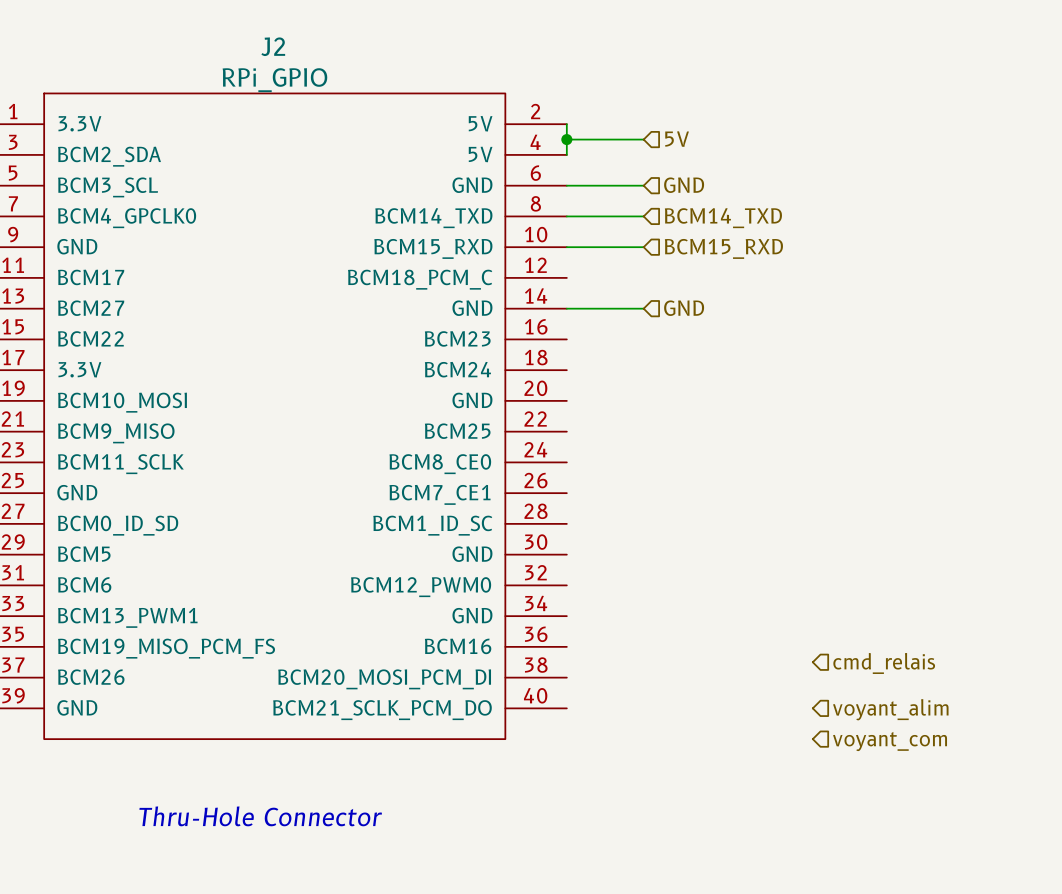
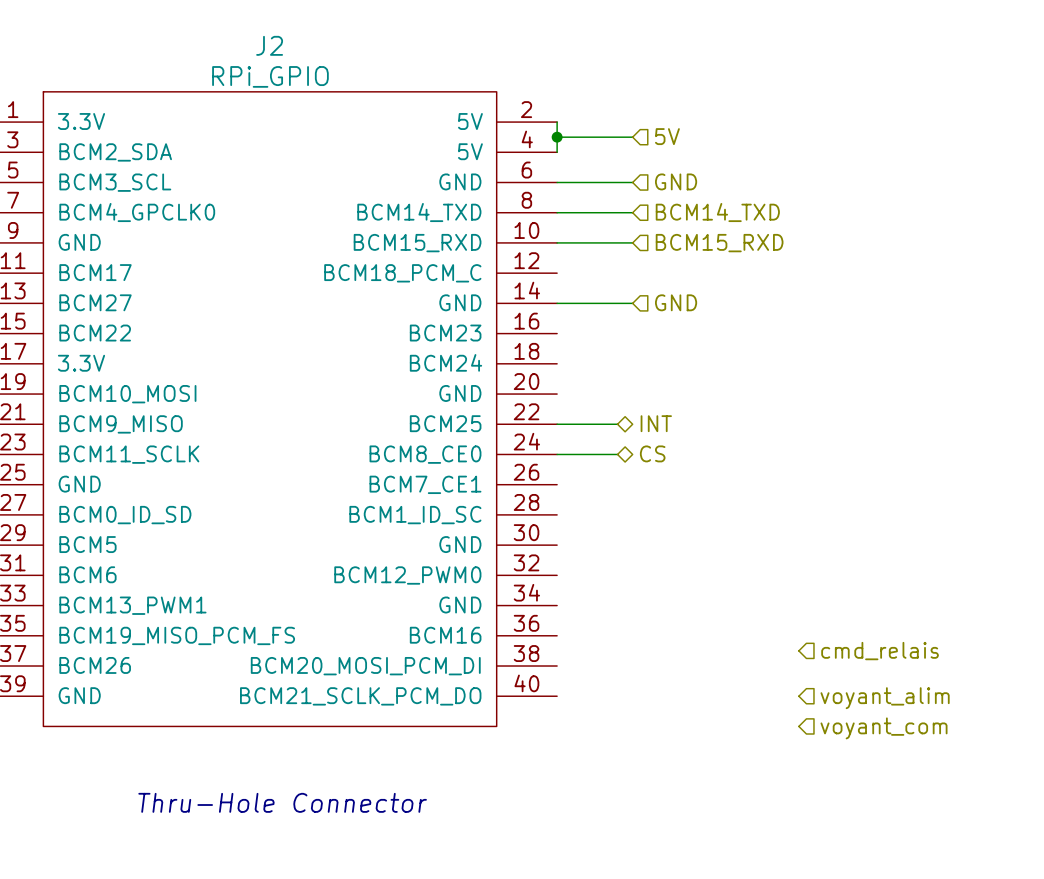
wire: none -> (557, 424) (617, 424)
hierarchical label: none -> INT (656, 423)
hierarchical label: none -> CS (652, 453)
wire: none -> (557, 454) (617, 454)

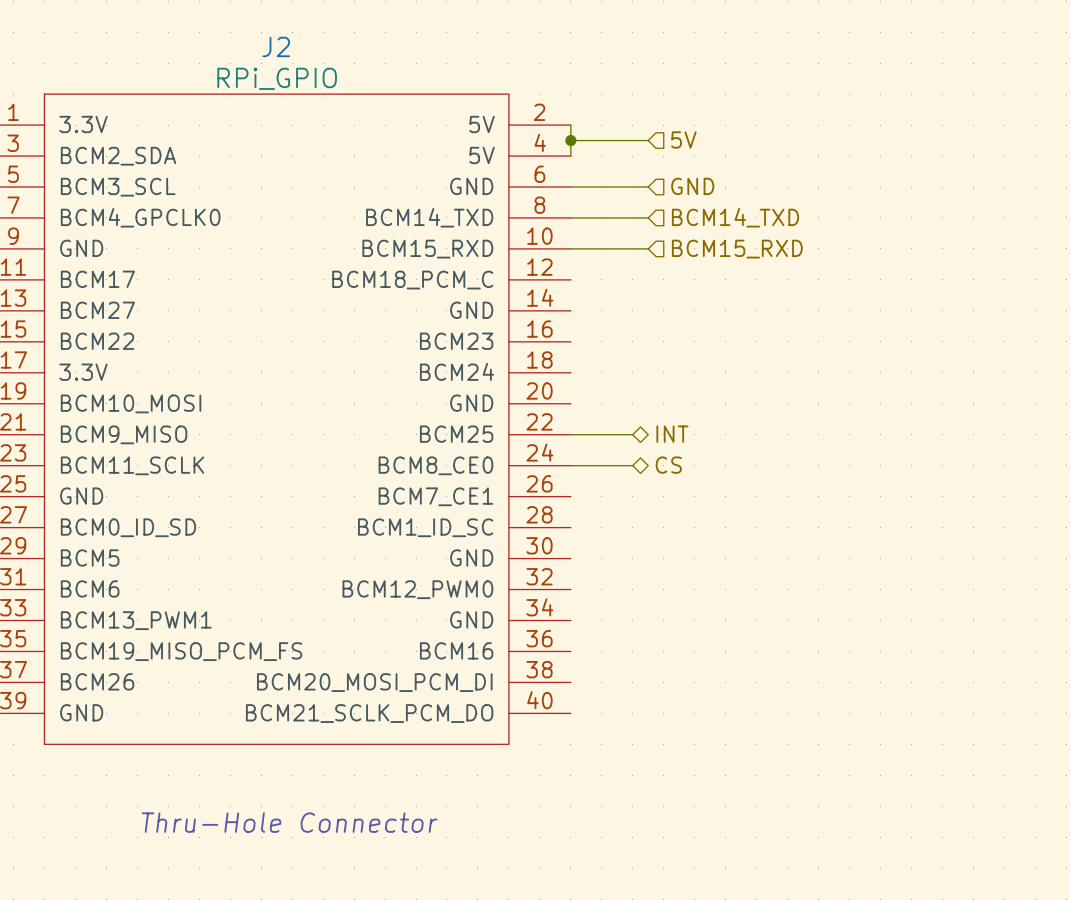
hierarchical label: GND (676, 302) -> none
wire: (557, 303) (632, 303) -> none
hierarchical label: cmd_relais (880, 651) -> none
hierarchical label: voyant_alim (885, 698) -> none
hierarchical label: voyant_com (884, 728) -> none

